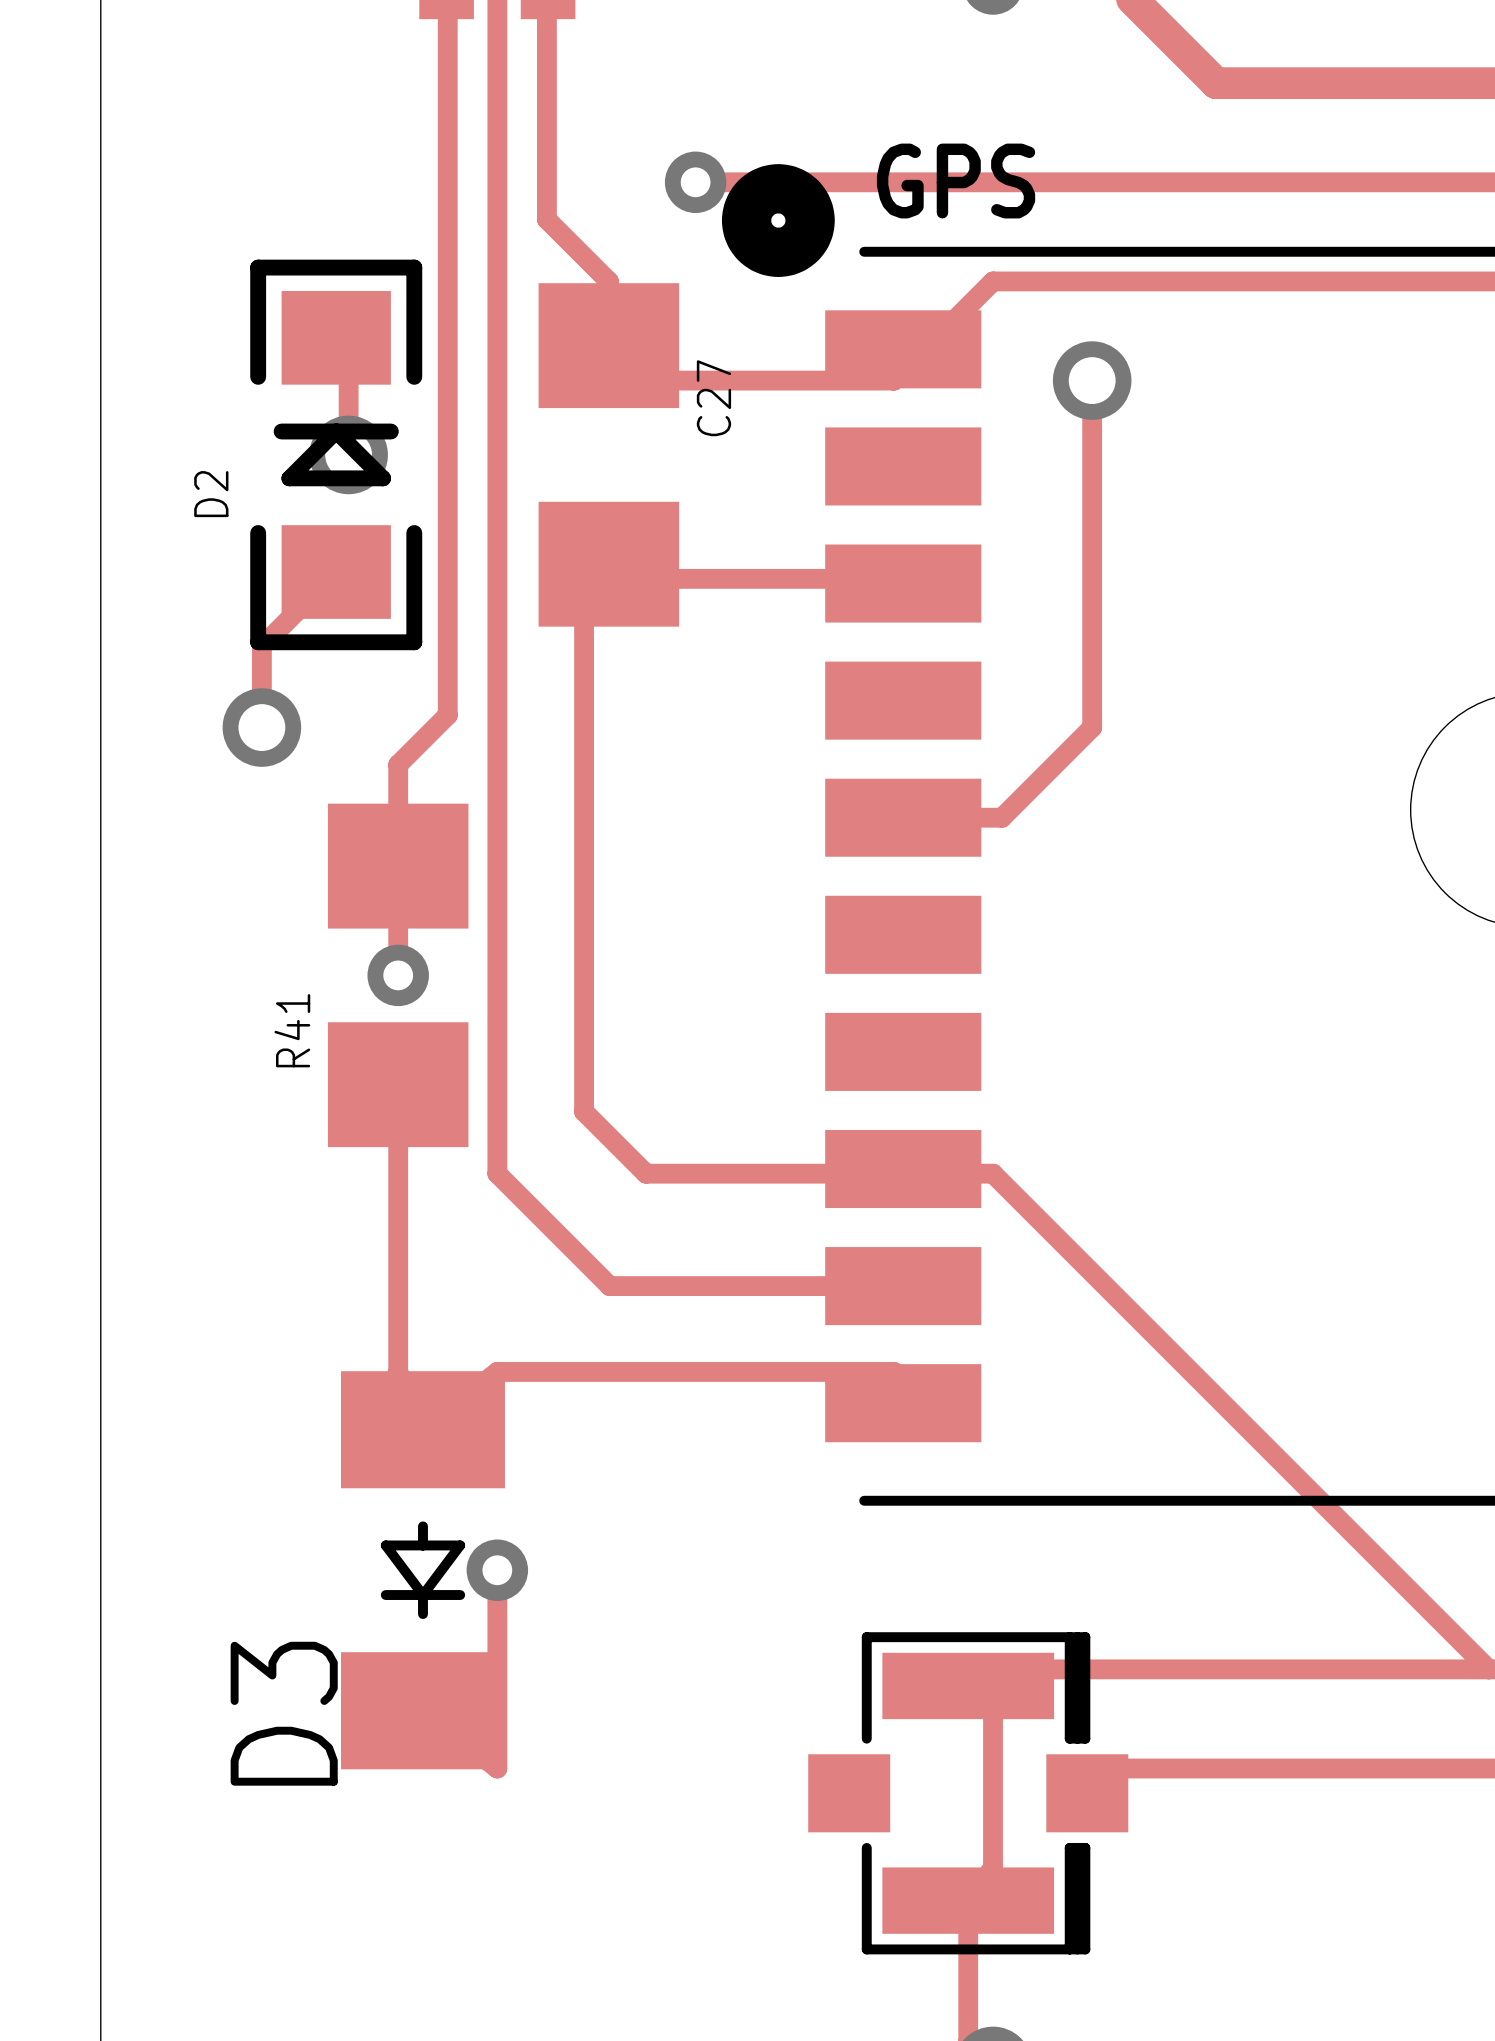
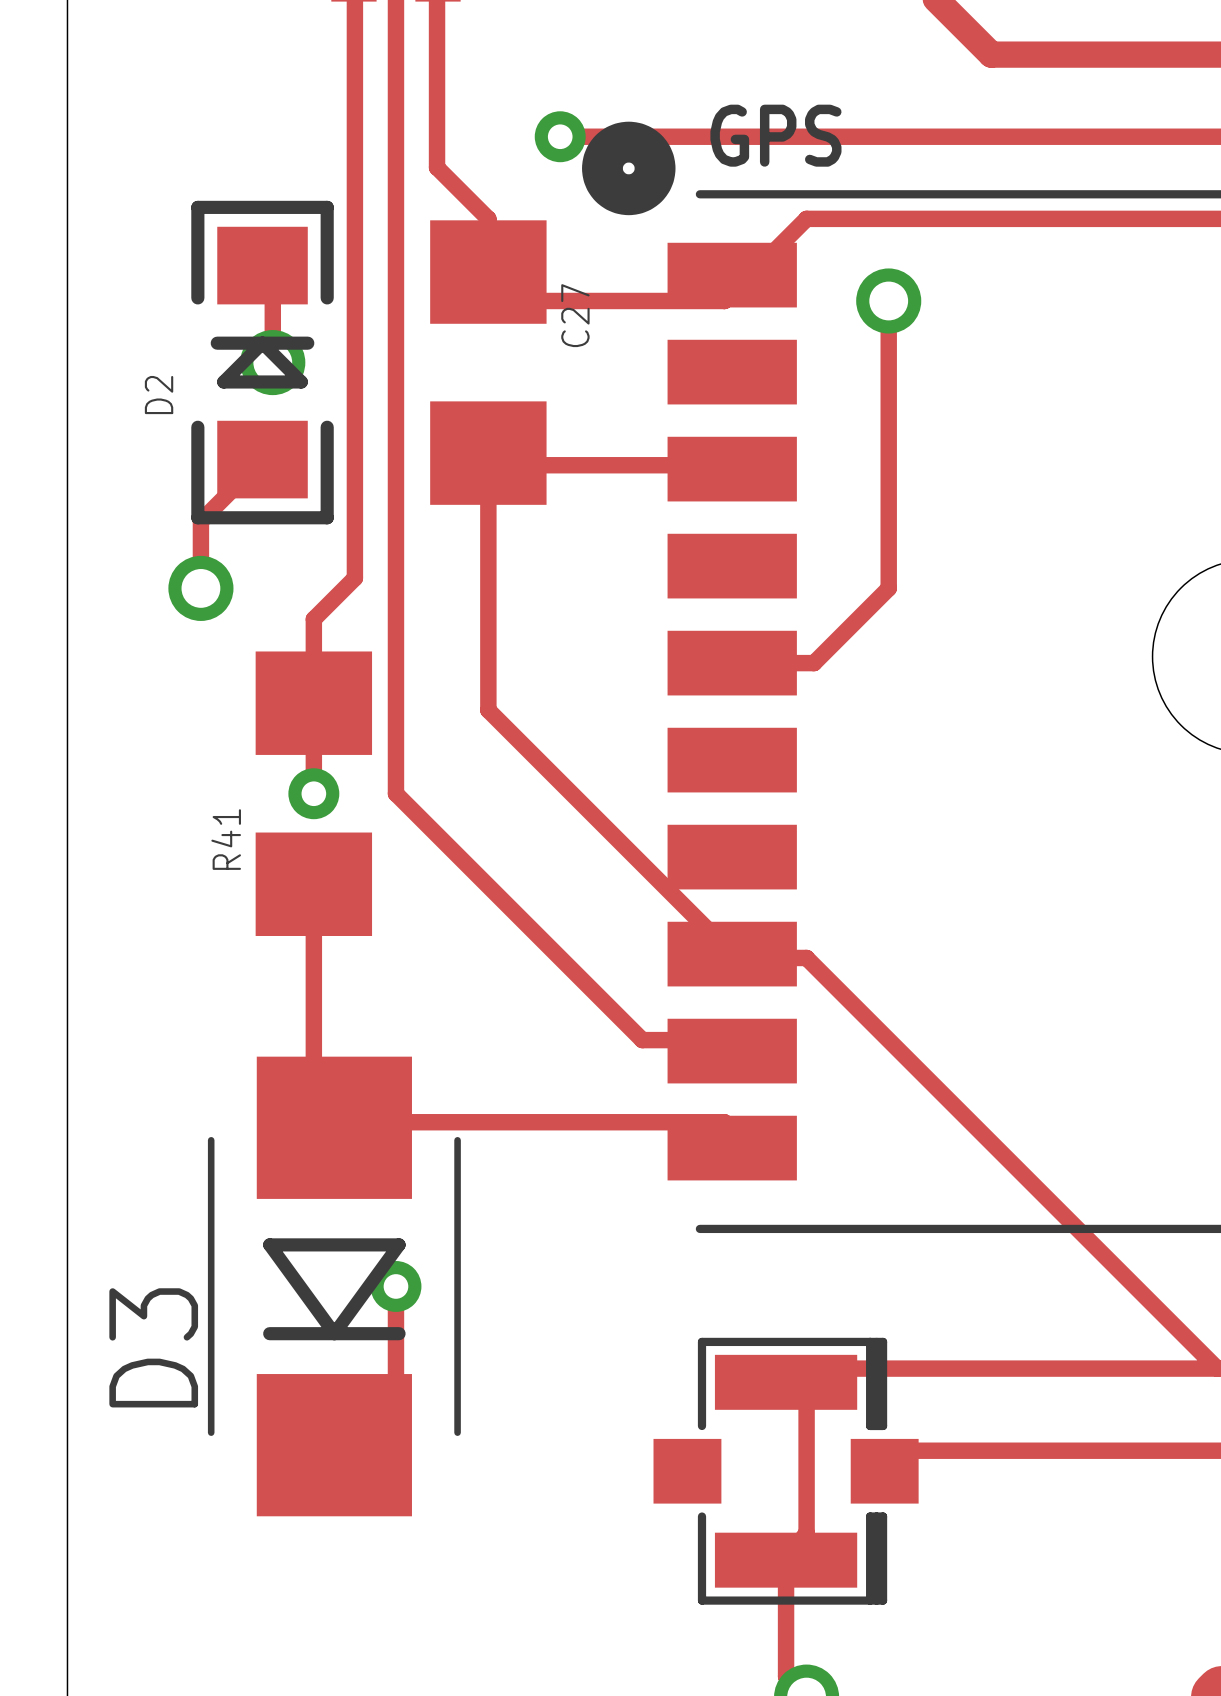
track: (608, 564) (584, 589) (584, 1111) (646, 1173) (893, 1173) -> (488, 453) (488, 710) (732, 954) (724, 957)
track: (497, 975) (497, 1173) (609, 1286) (903, 1286) -> (395, 793) (642, 1040) (724, 1040)
D3 footprint: [341, 1371, 505, 1770] -> [207, 1056, 461, 1517]

